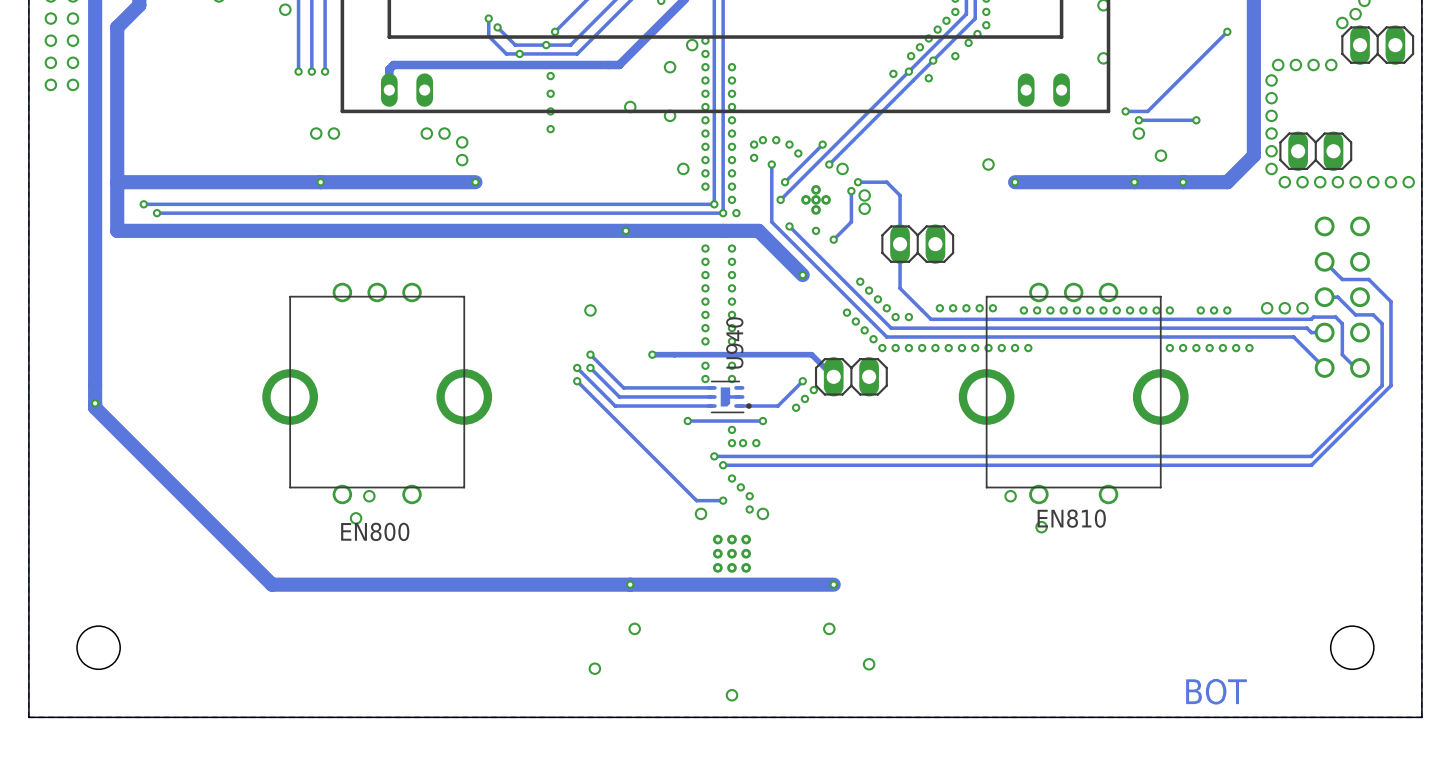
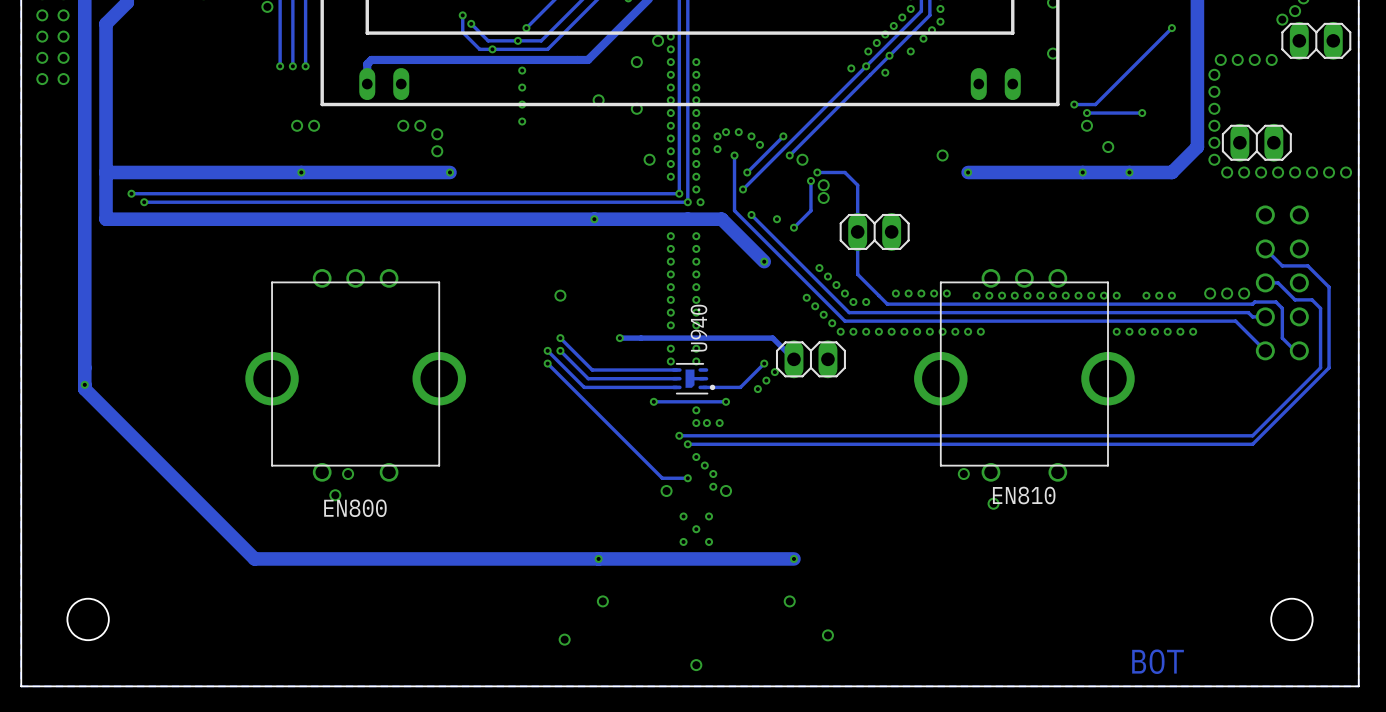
part: (816, 199) -> none
via: none -> (683, 516)
via: none -> (709, 516)
part: (731, 553) -> none
via: none -> (696, 529)
via: none -> (683, 541)
via: none -> (709, 541)

